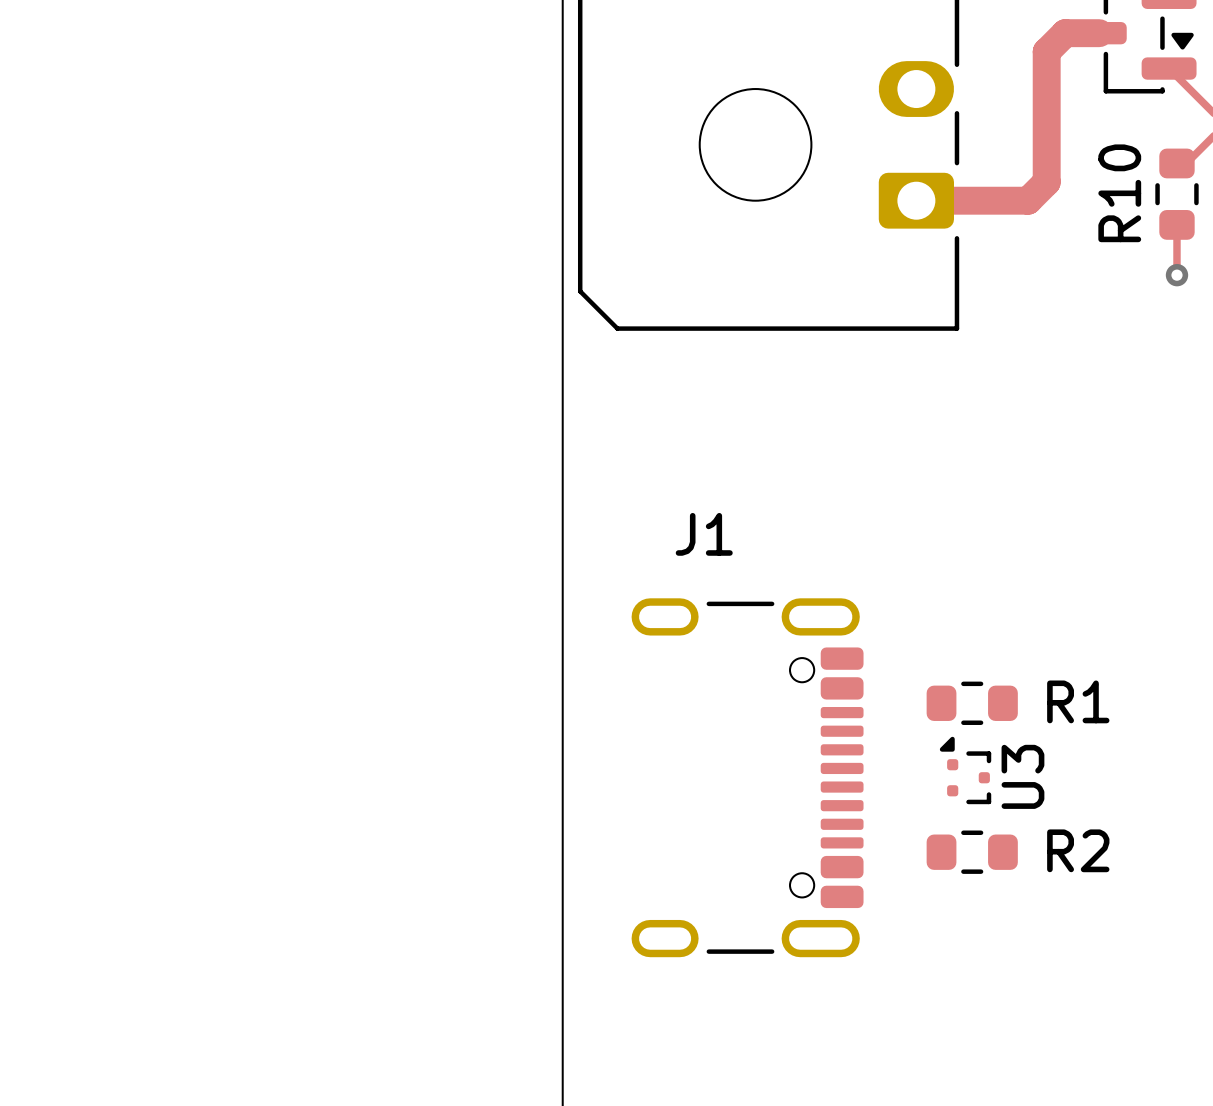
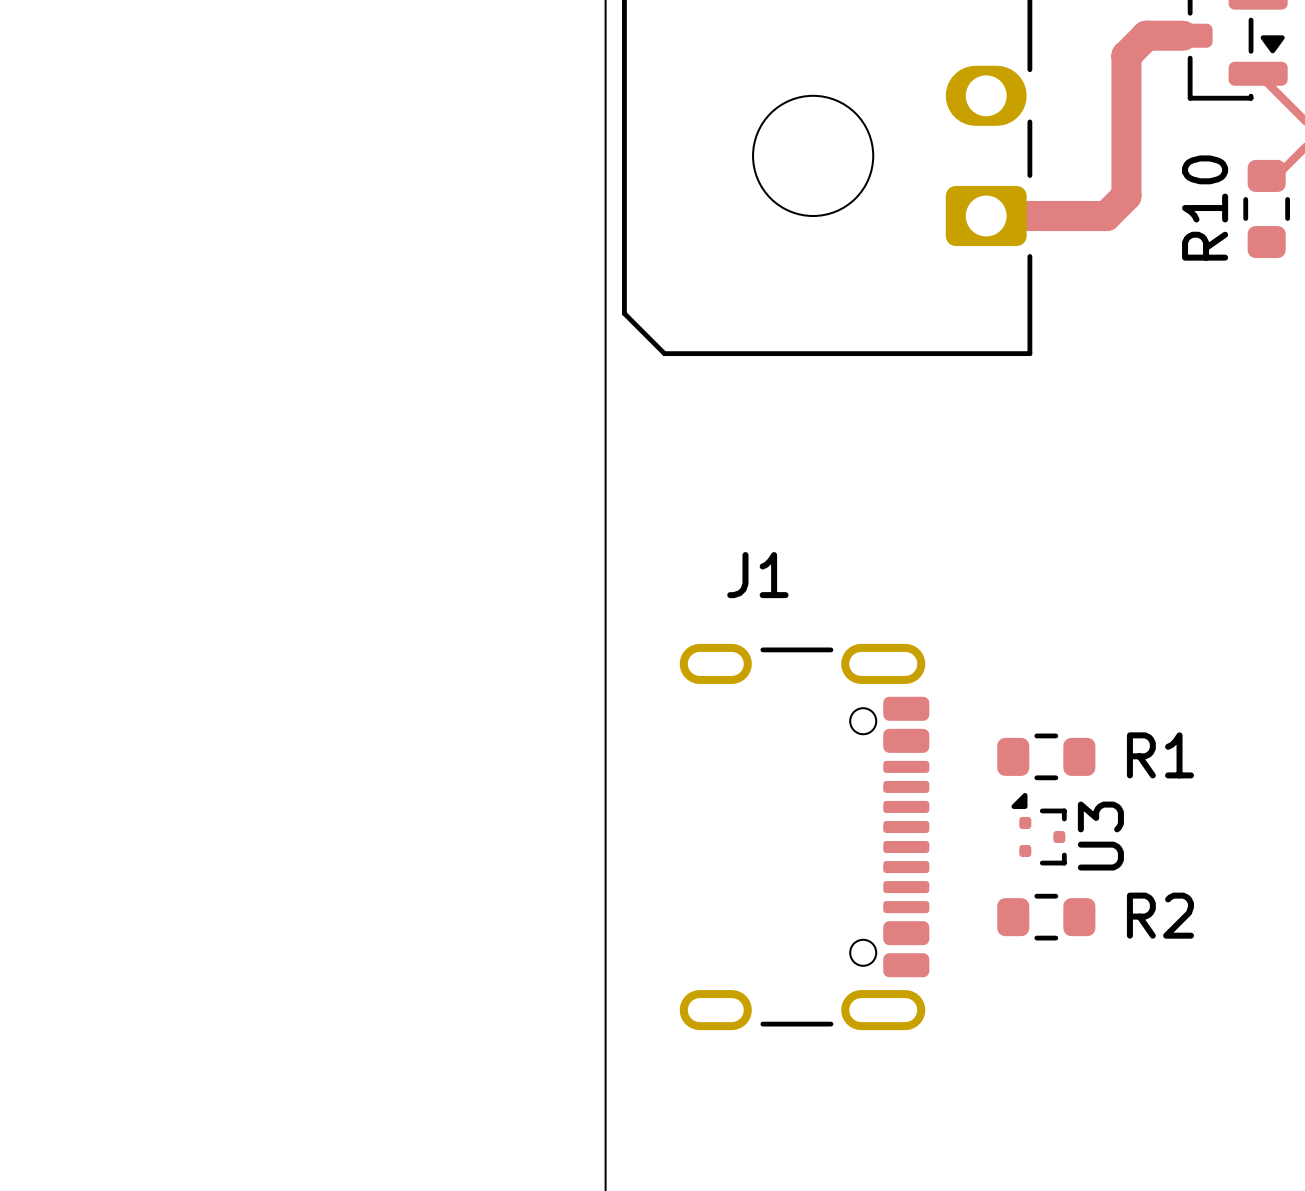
track: (1176, 224) (1176, 275) -> none
via: (1176, 275) -> none

